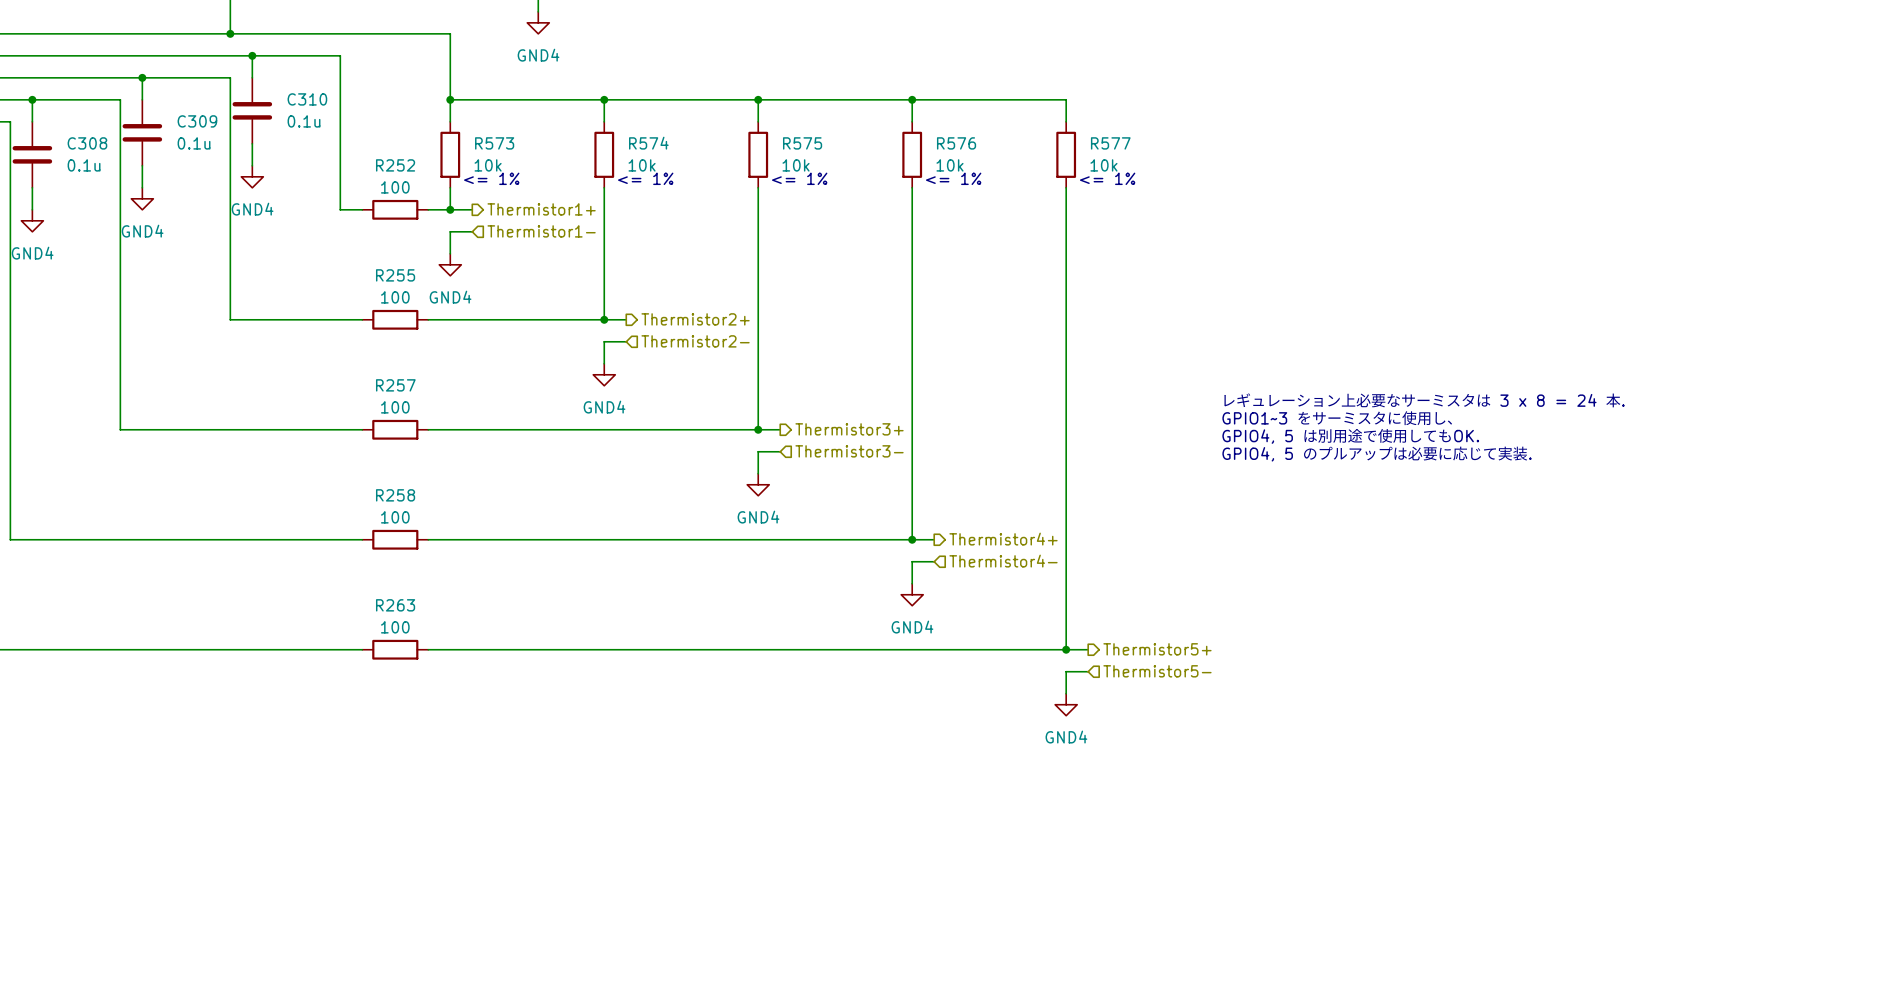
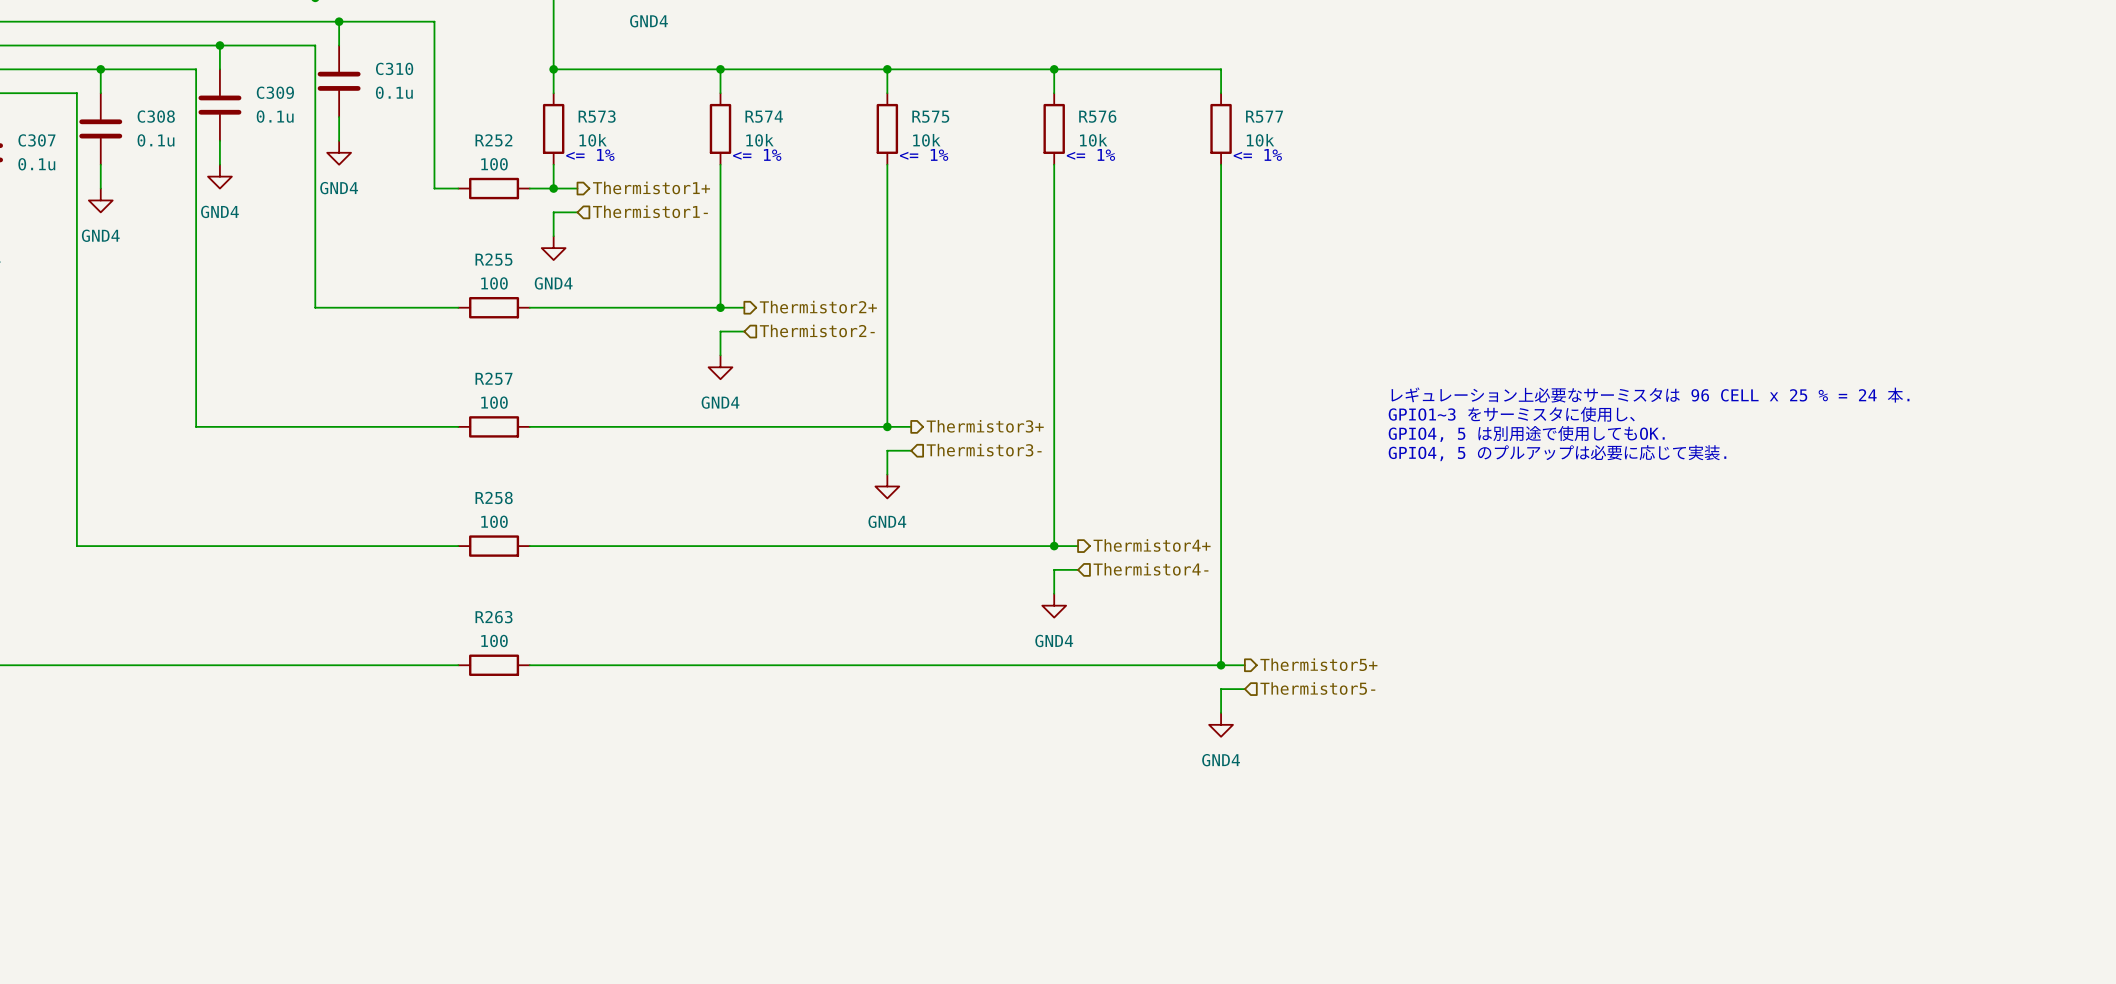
text: レギュレーション上必要なサーミスタは 3 x 8 = 24 本. (1424, 400) -> レギュレーション上必要なサーミスタは 96 CELL x 25 % = 24 本. (1650, 395)

